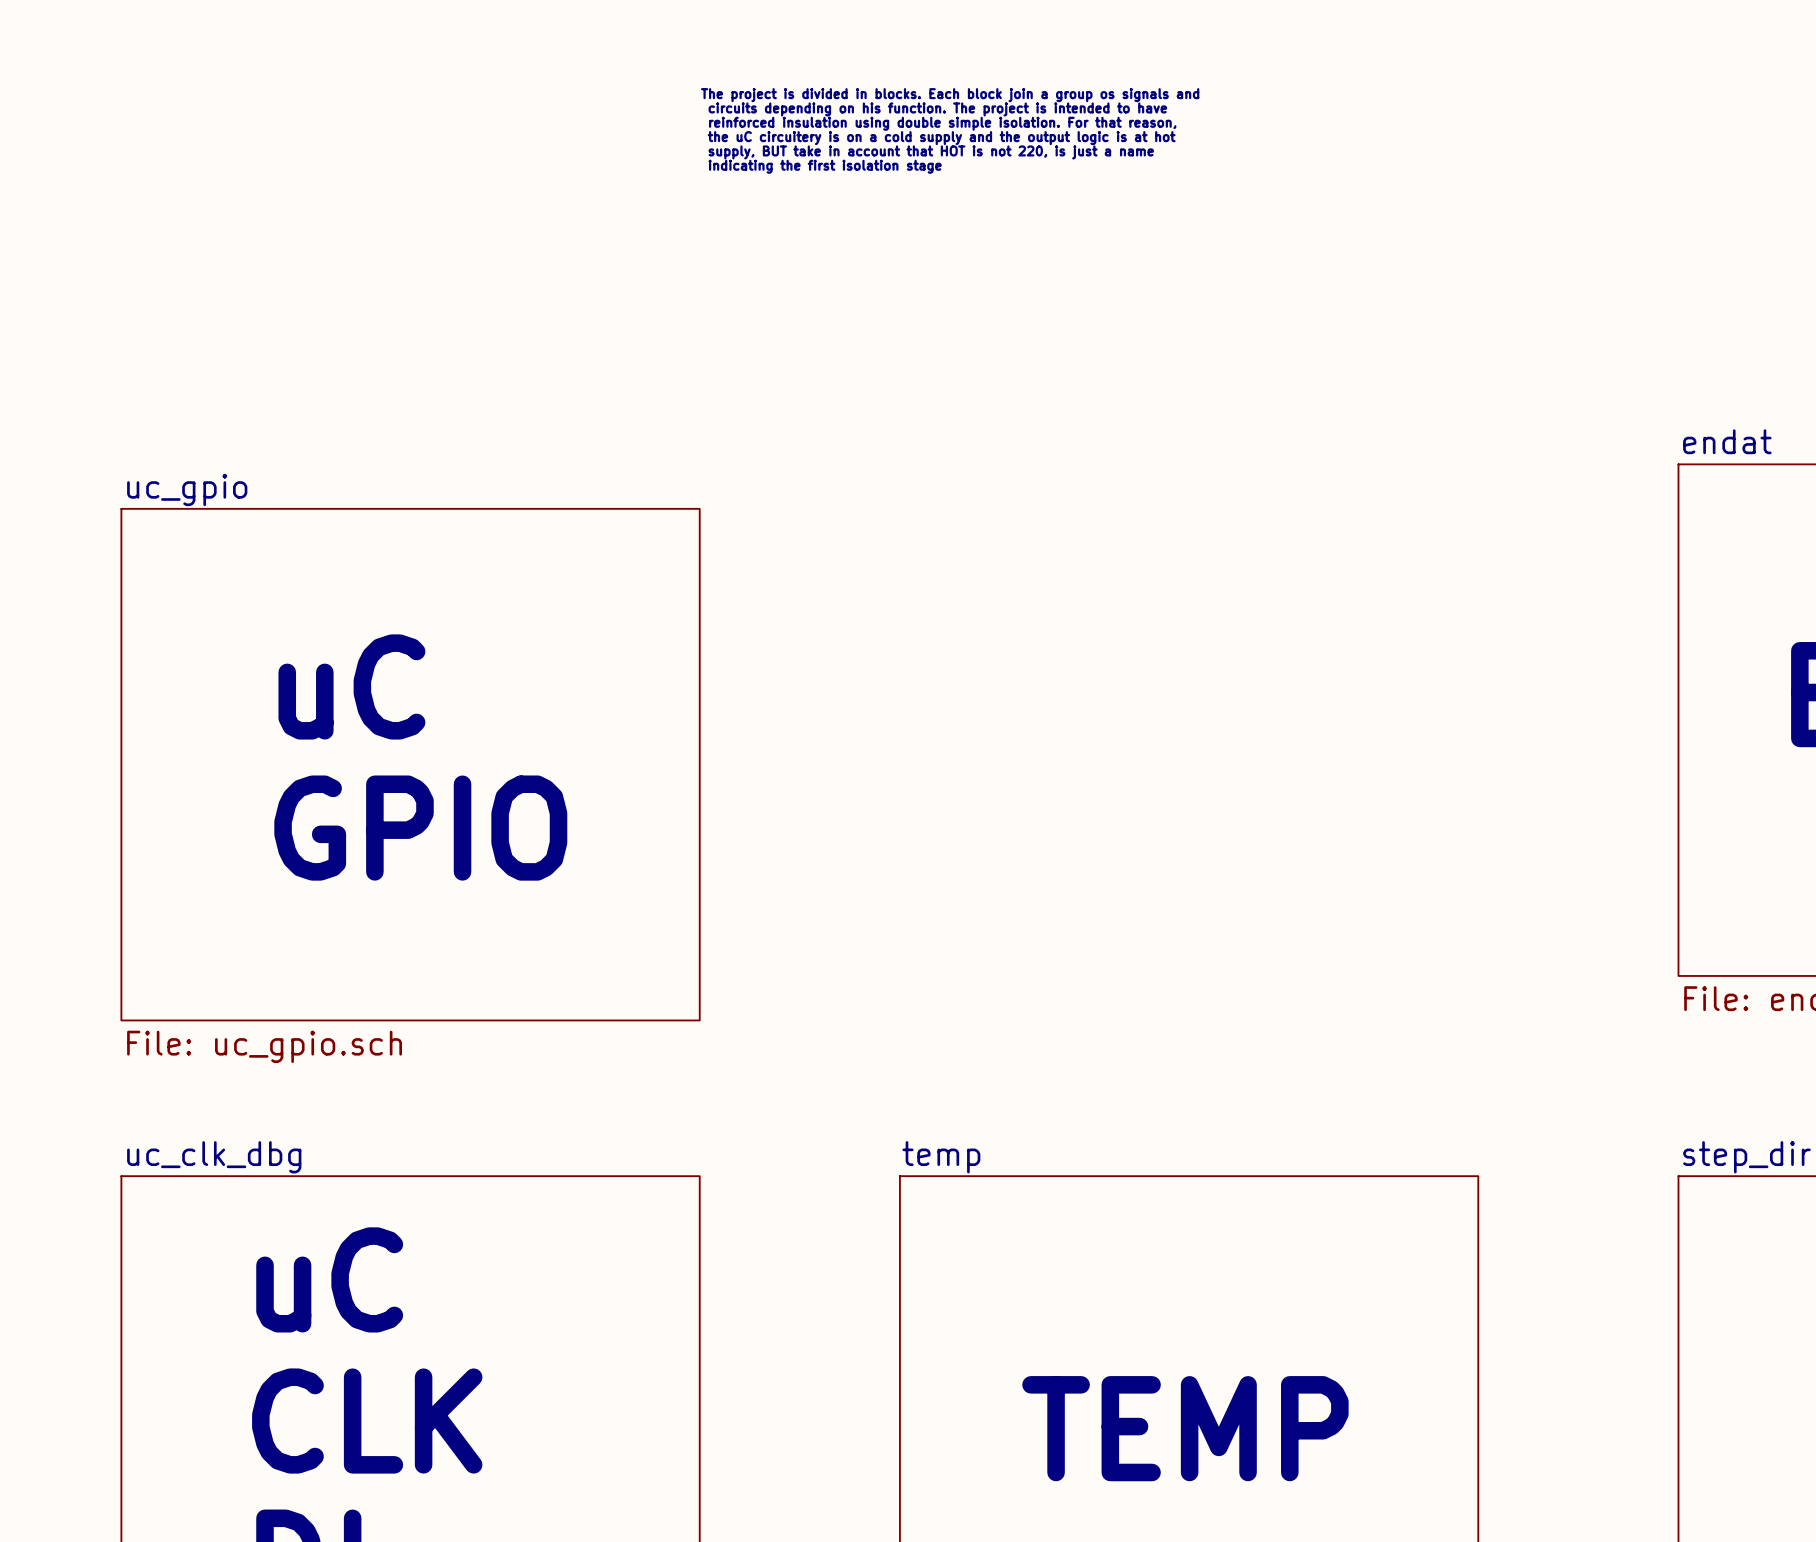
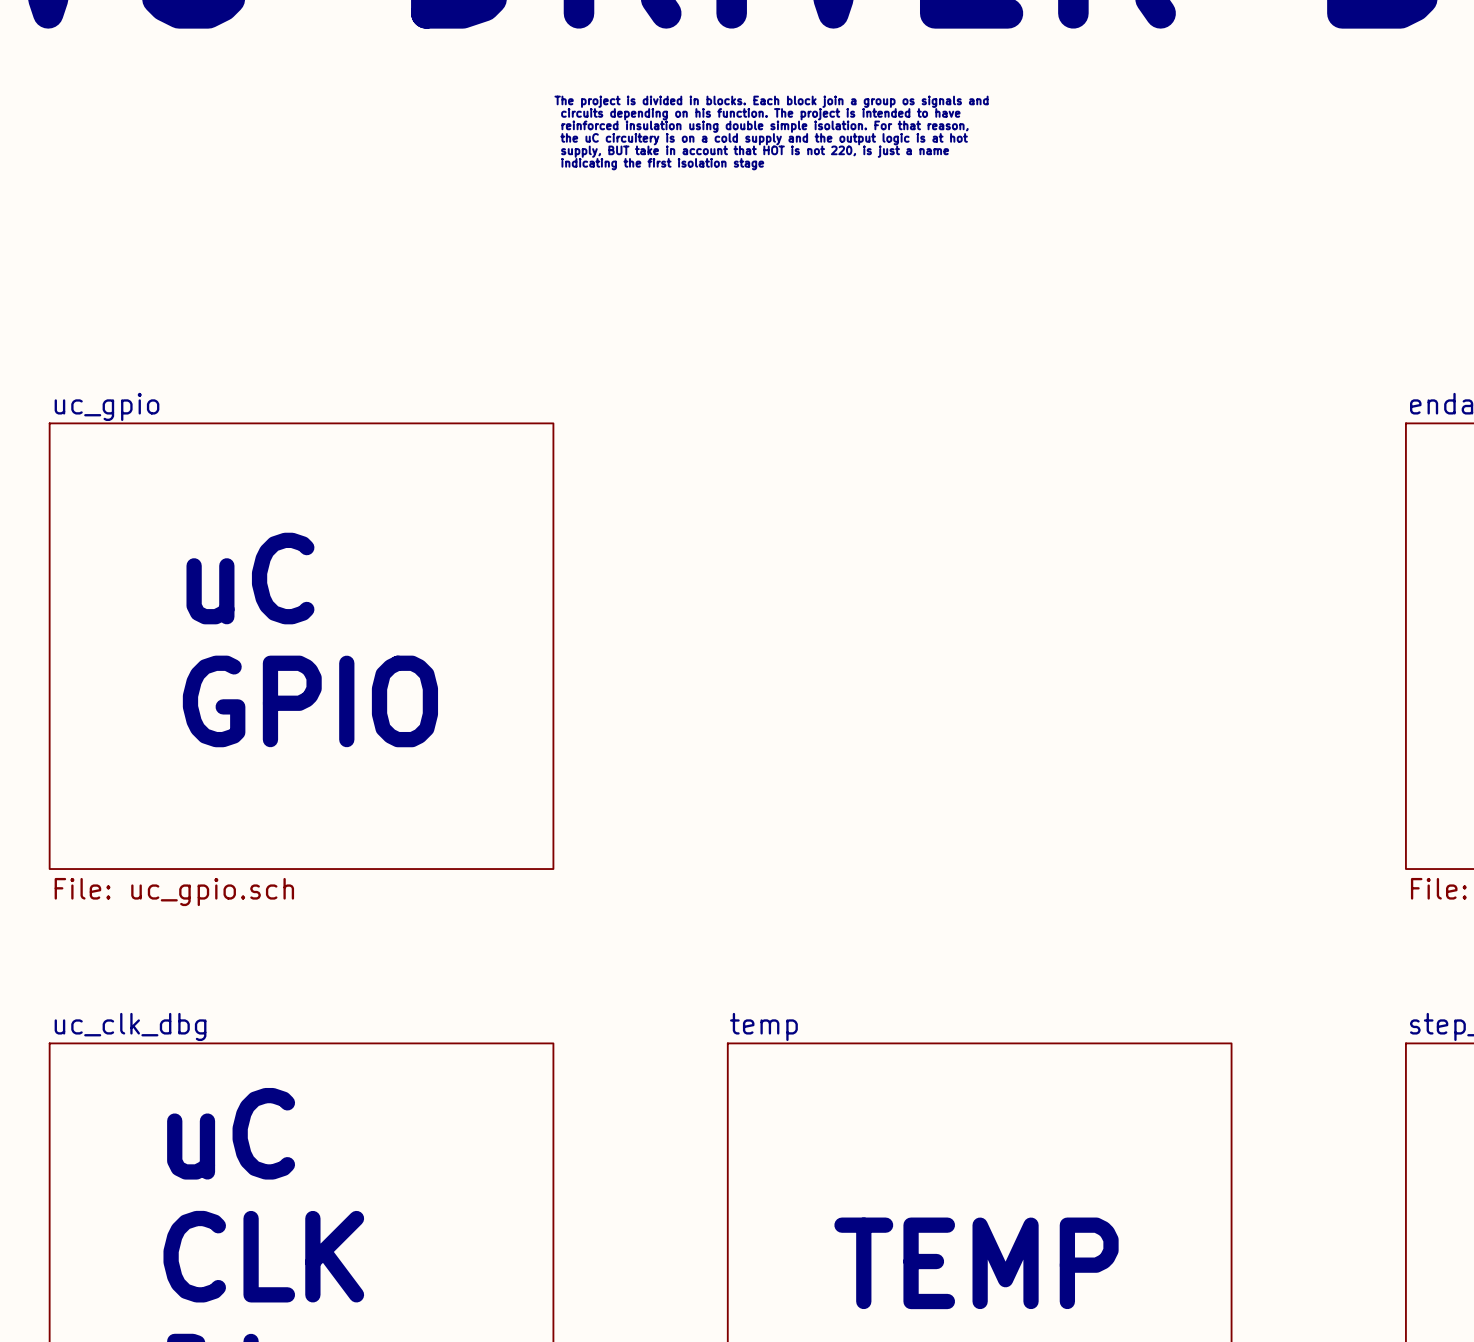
text position: uC (351, 686) -> uC (250, 578)
sheet uc_gpio position: (410, 764) -> (301, 646)
text position: GPIO (420, 828) -> GPIO (310, 701)

